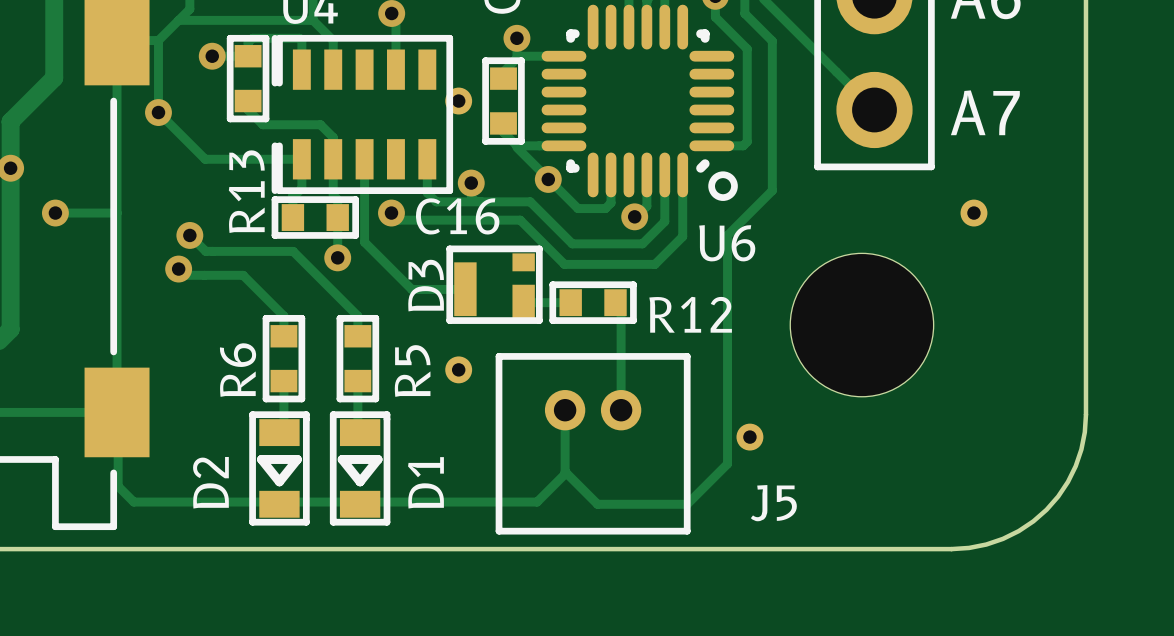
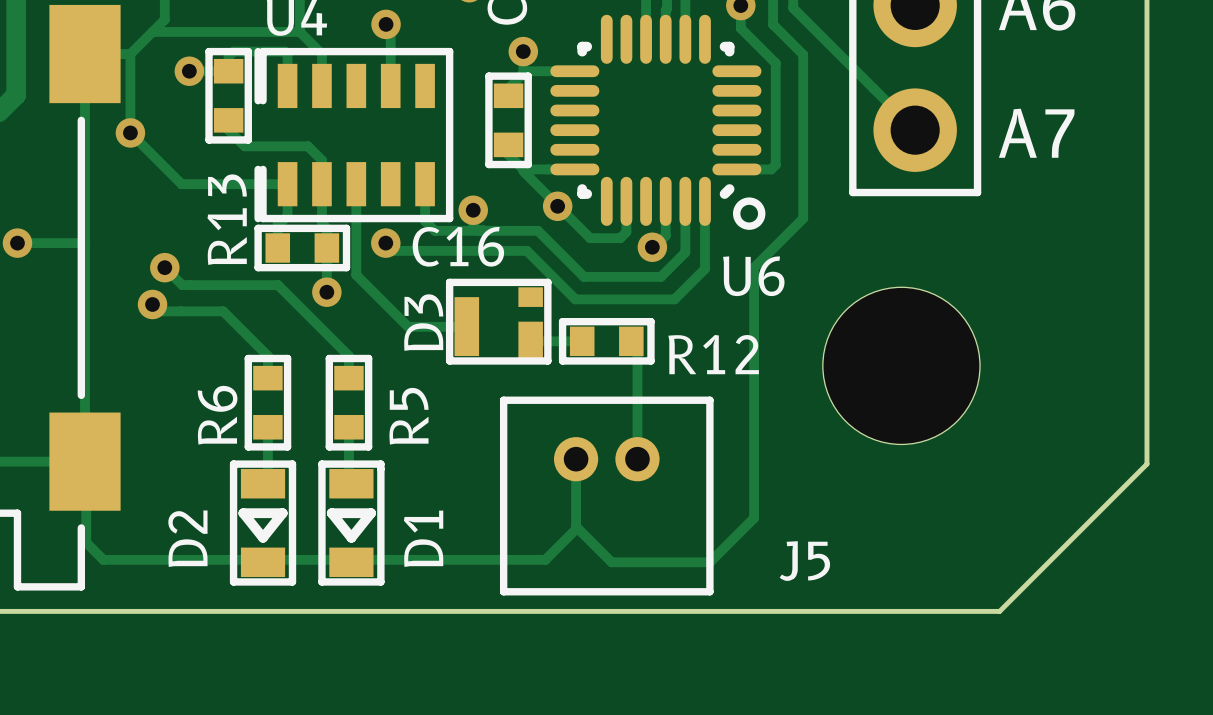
part: (458, 101) -> none
part: (973, 213) -> none
part: (458, 369) -> none
board edge: (1085, 414) (1084, 432) (1075, 466) (1058, 496) (1046, 509) (1033, 521) (1003, 538) (969, 547) (951, 549) -> (1146, 464) (999, 611)
part: (749, 437) -> none

